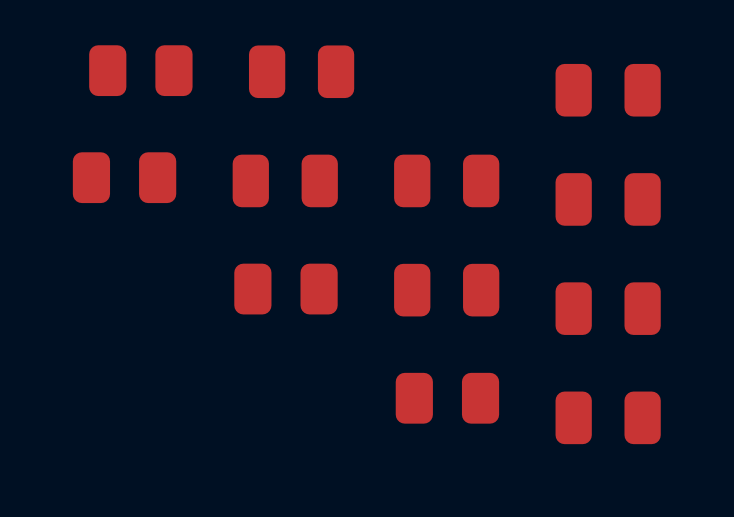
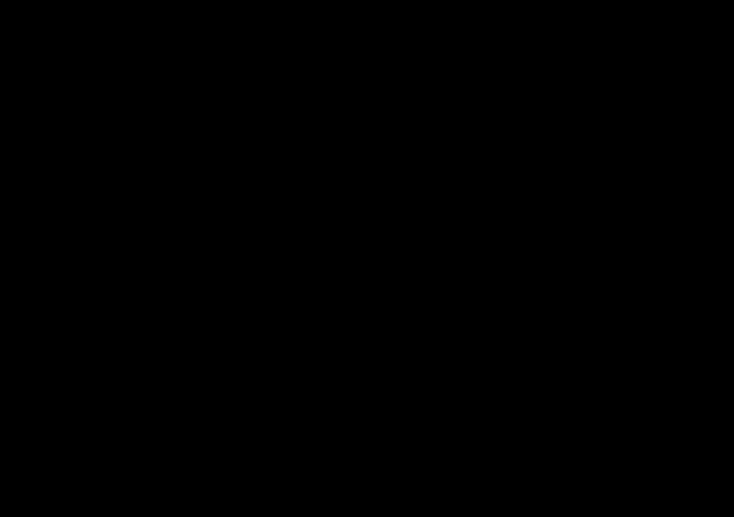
part: (140, 70) -> none
part: (301, 71) -> none
part: (608, 90) -> none
part: (124, 177) -> none
part: (285, 180) -> none
part: (446, 180) -> none
part: (608, 199) -> none
part: (285, 289) -> none
part: (446, 290) -> none
part: (608, 308) -> none
part: (447, 398) -> none
part: (608, 417) -> none

